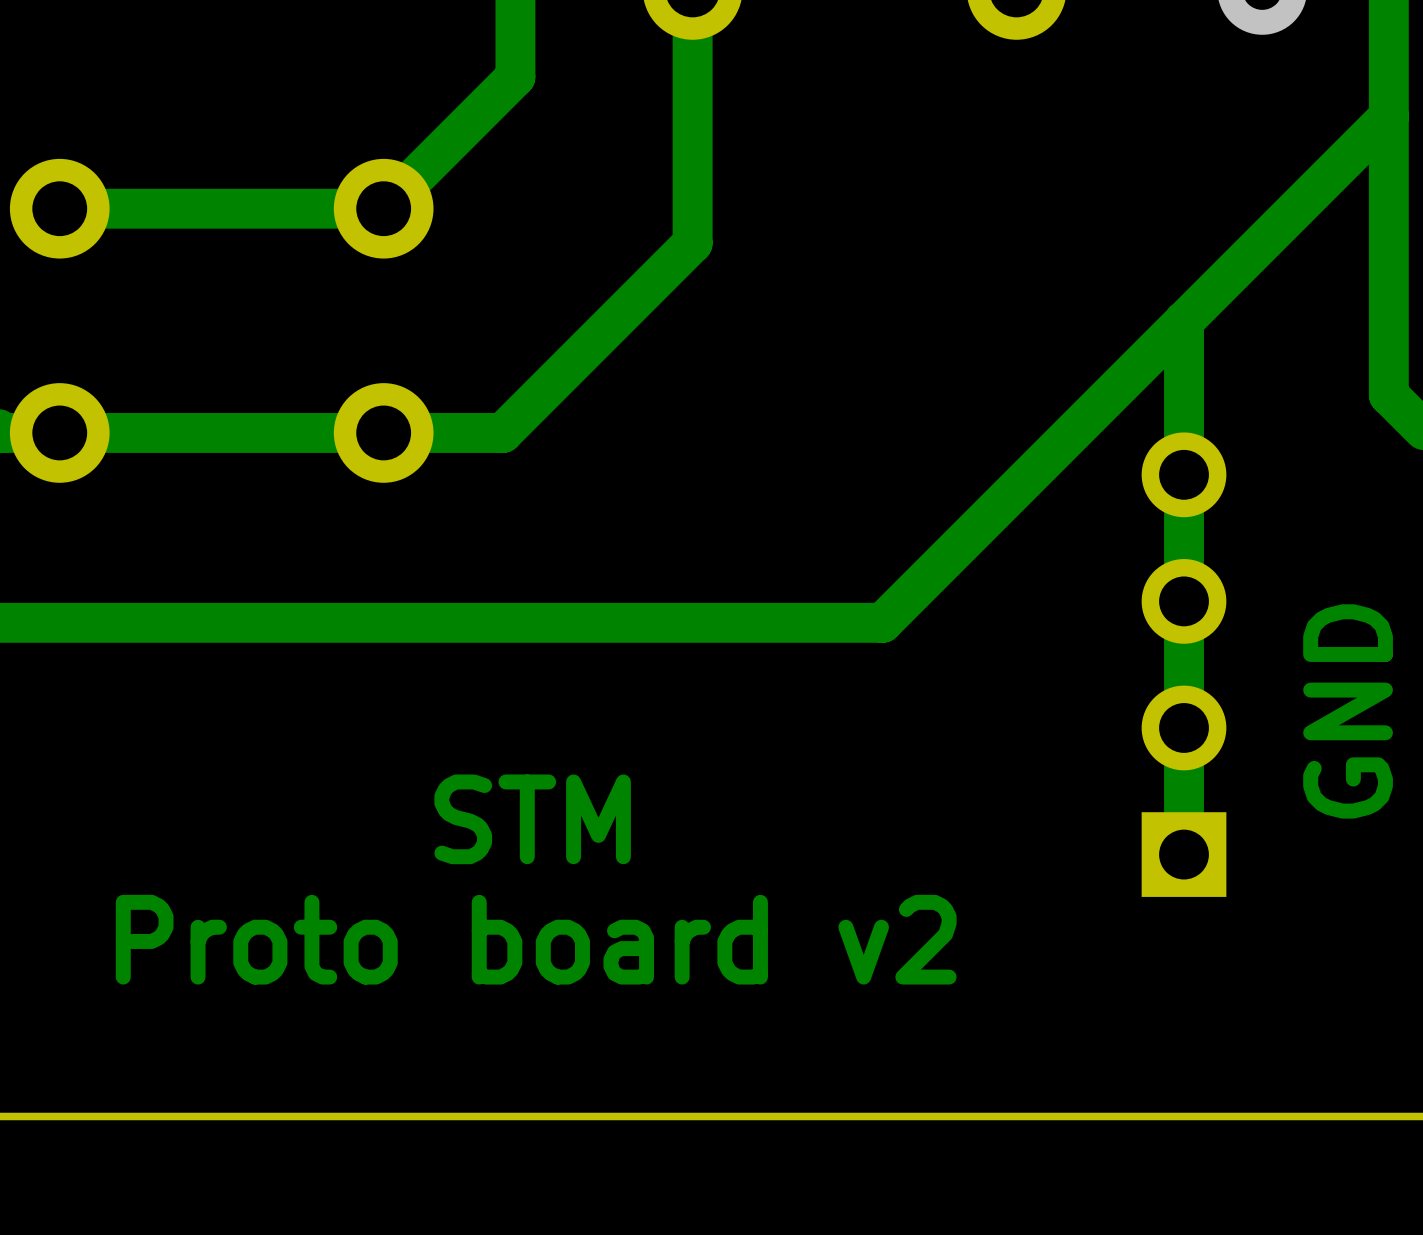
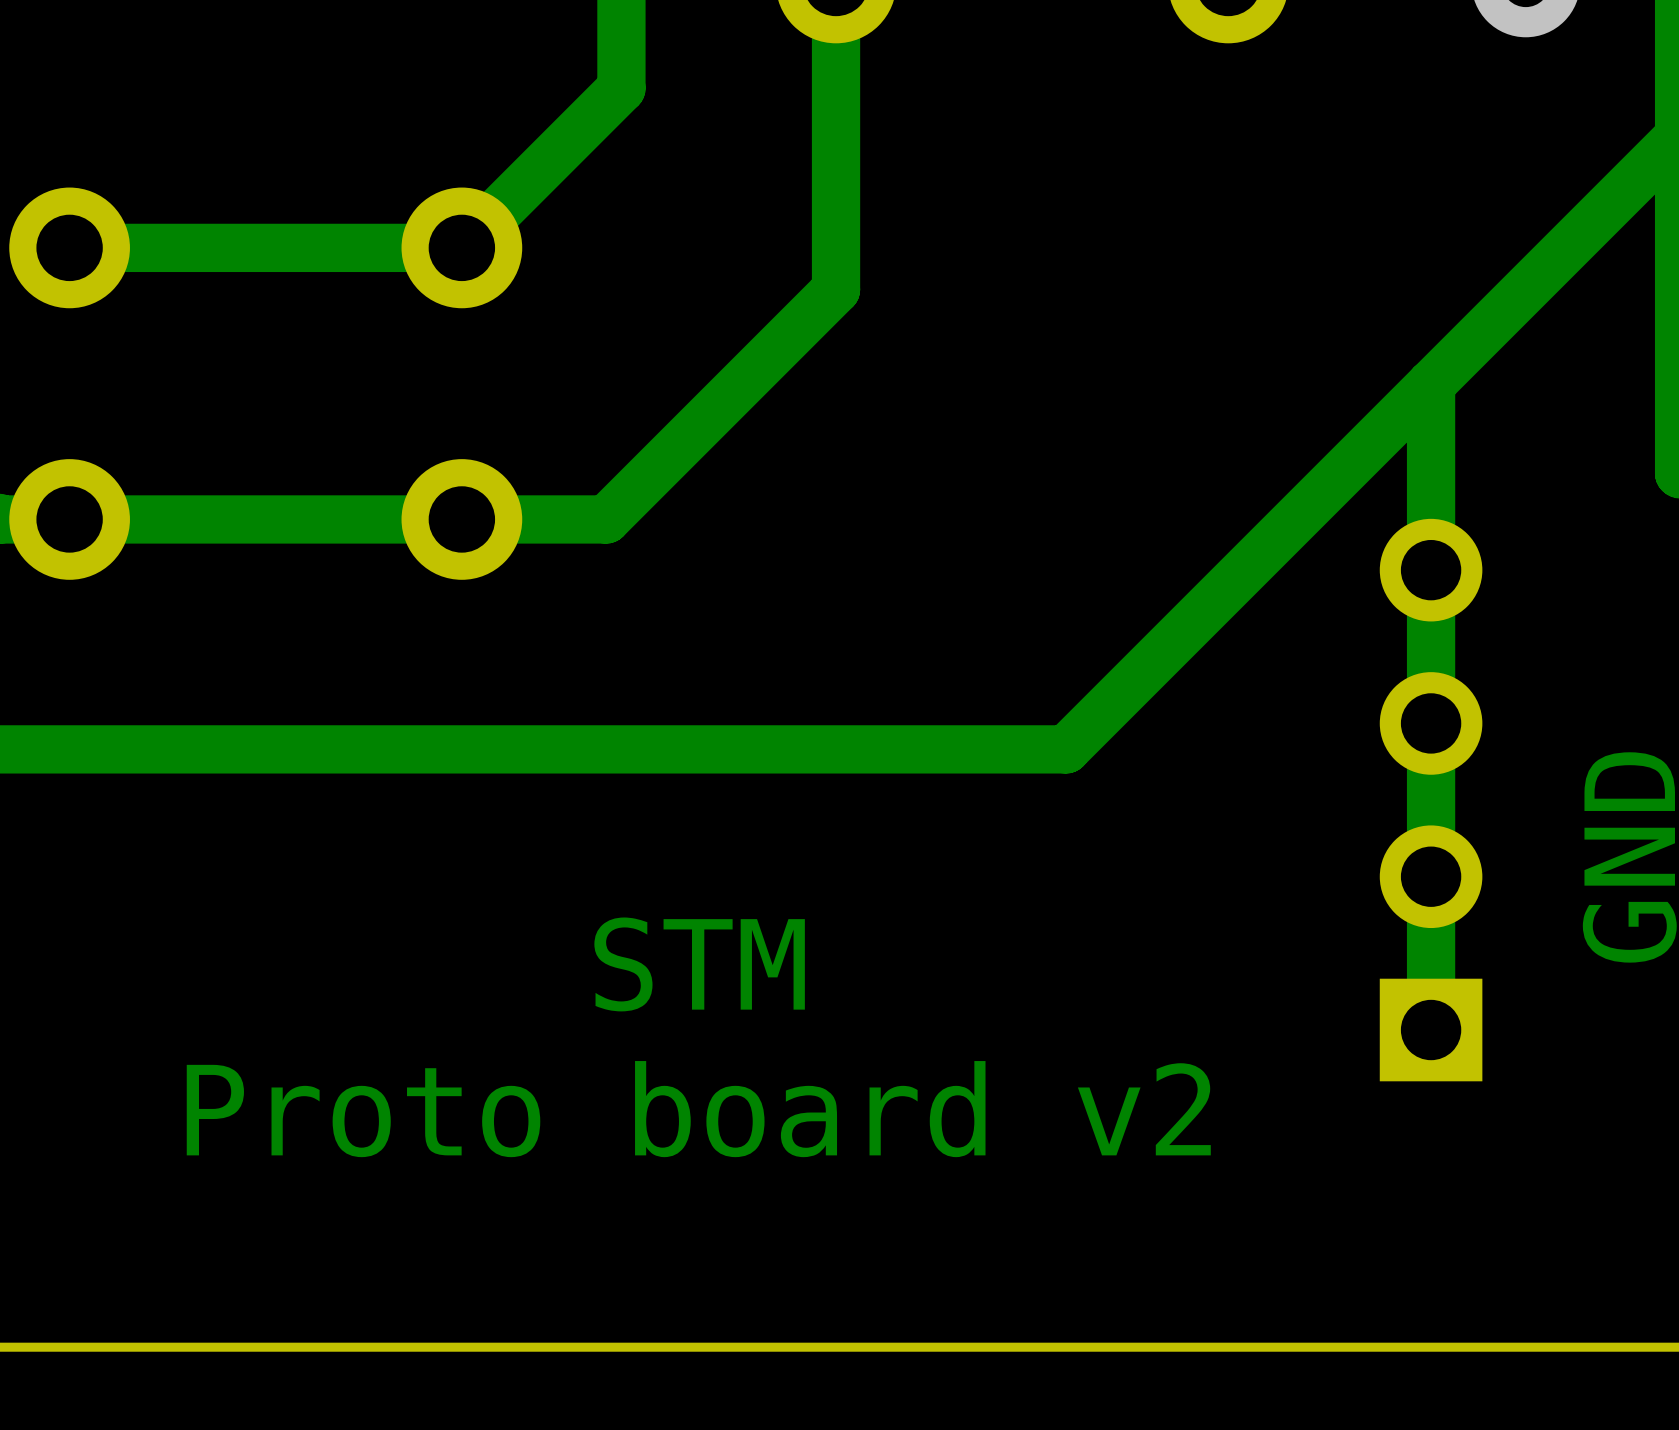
text position: STM (532, 819) -> STM (699, 964)
text position: Proto board v2 (536, 939) -> Proto board v2 (698, 1109)

